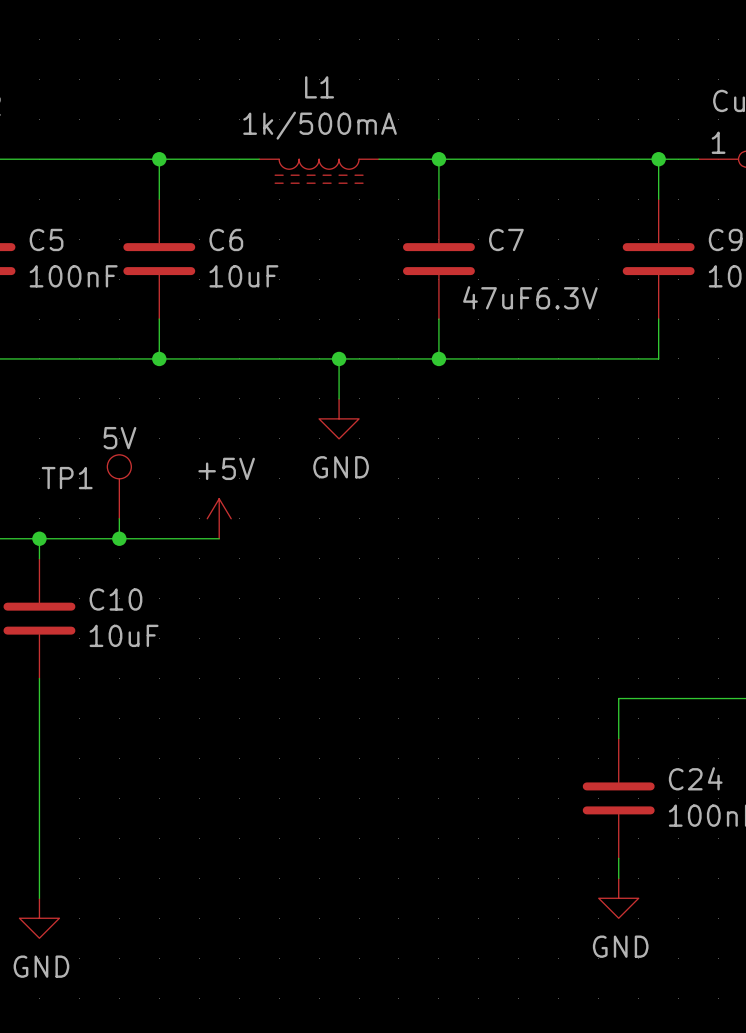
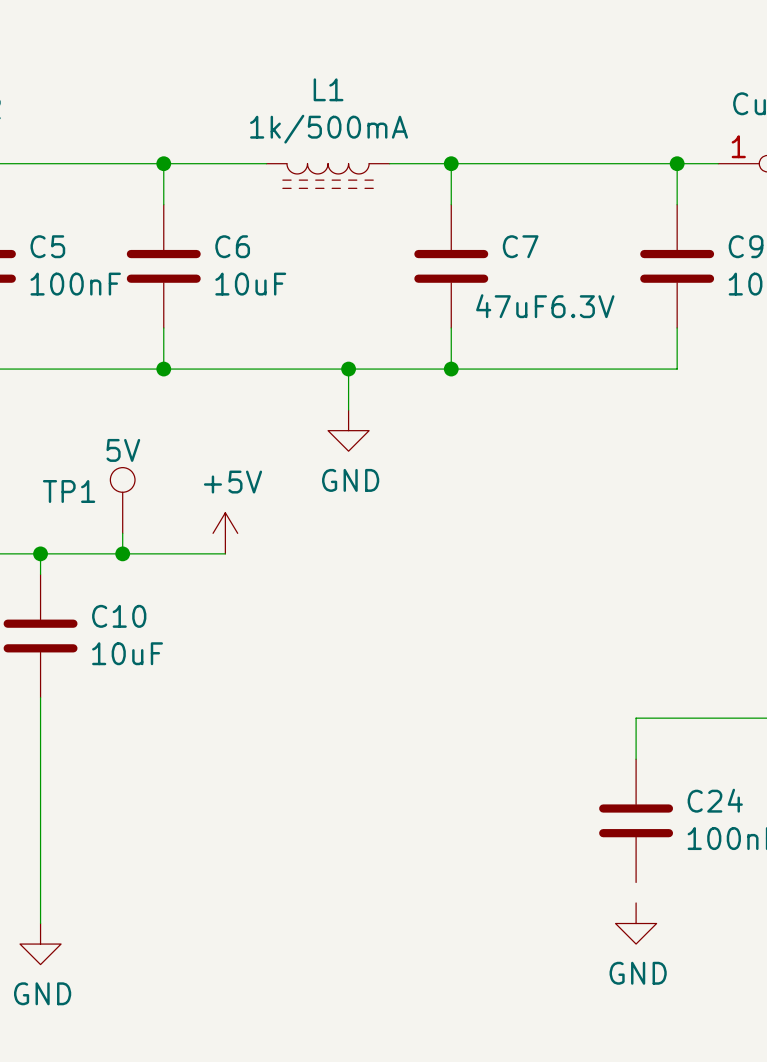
wire: (618, 858) (618, 878) -> none

